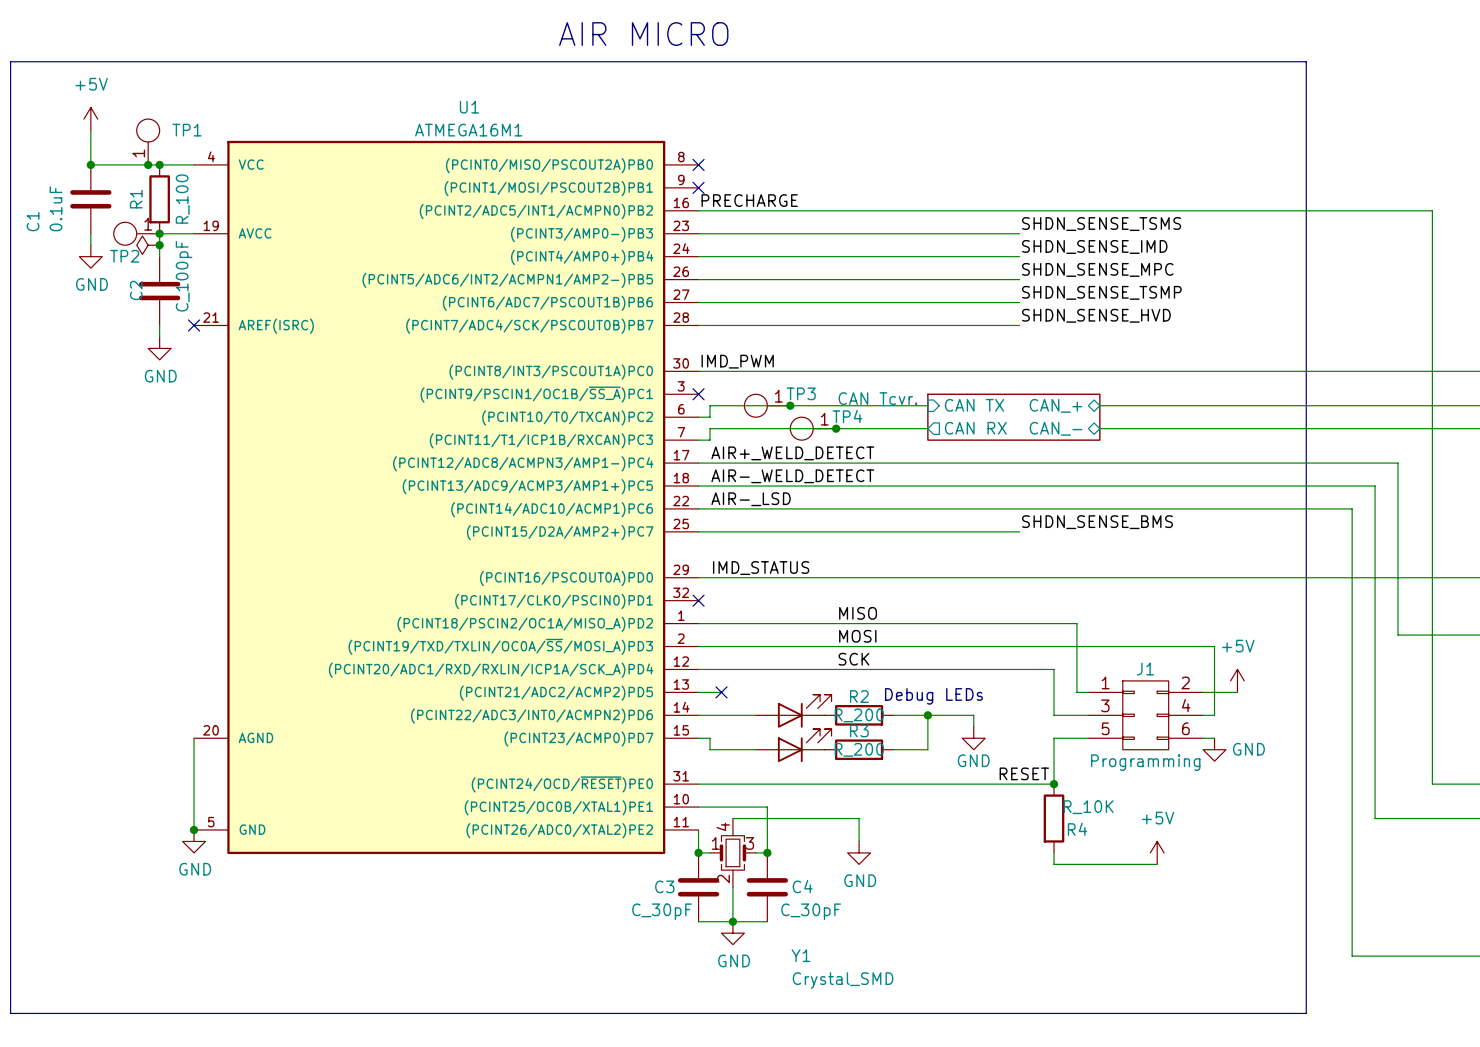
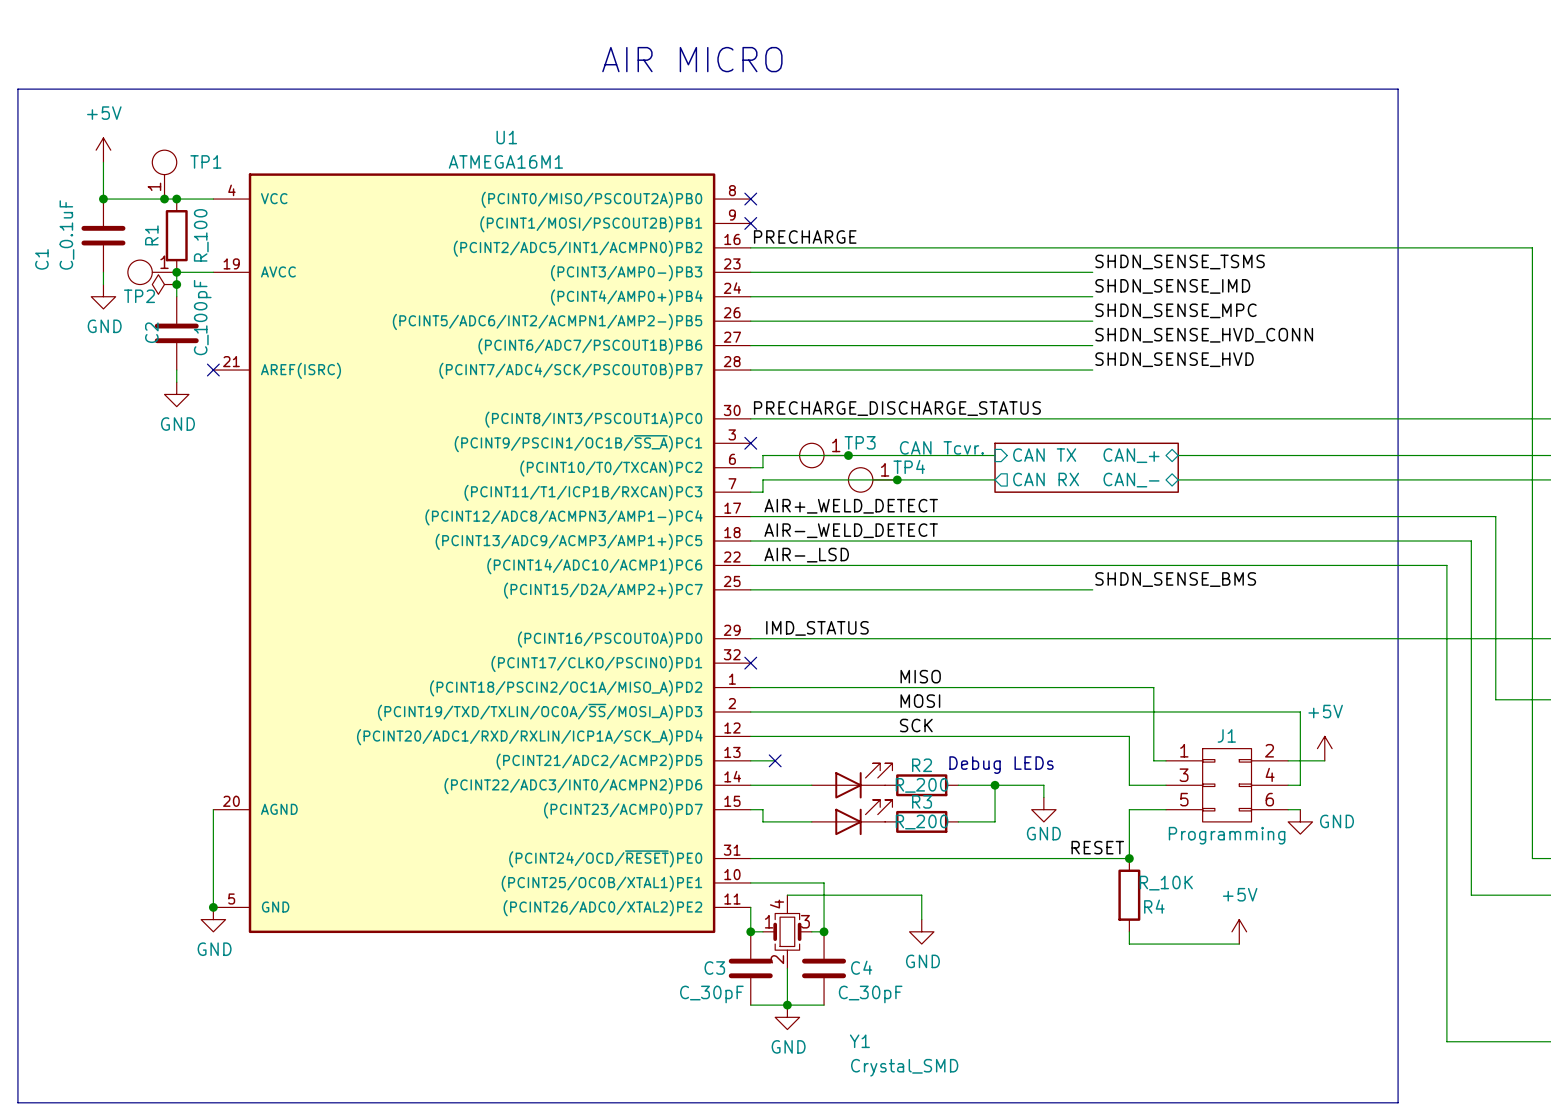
C1 value: 0.1uF (56, 208) -> C_0.1uF (66, 235)
label: SHDN_SENSE_TSMP (1101, 292) -> SHDN_SENSE_HVD_CONN (1204, 335)
label: IMD_PWM (737, 361) -> PRECHARGE_DISCHARGE_STATUS (897, 408)

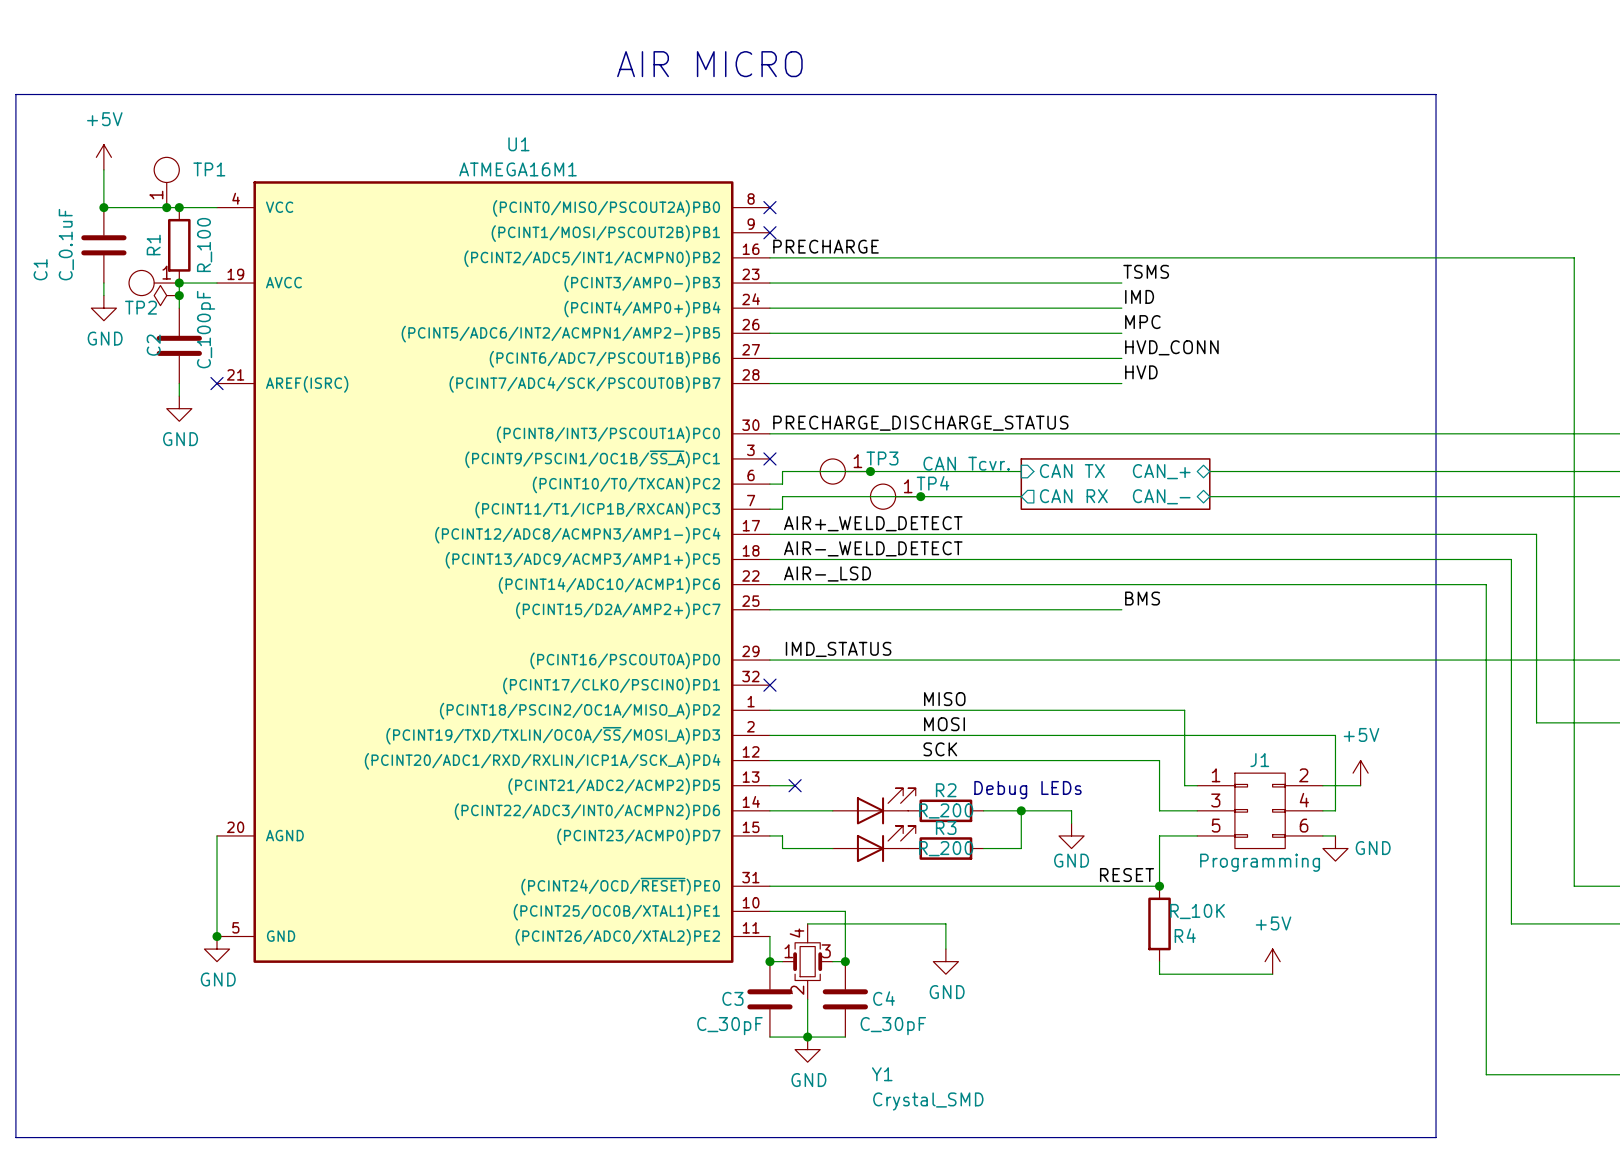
label: SHDN_SENSE_TSMS (1180, 261) -> TSMS (1146, 271)
label: SHDN_SENSE_IMD (1172, 286) -> IMD (1139, 296)
label: SHDN_SENSE_MPC (1175, 310) -> MPC (1142, 322)
label: SHDN_SENSE_HVD_CONN (1204, 335) -> HVD_CONN (1171, 347)
label: SHDN_SENSE_HVD (1174, 359) -> HVD (1141, 372)
label: SHDN_SENSE_BMS (1175, 579) -> BMS (1142, 598)

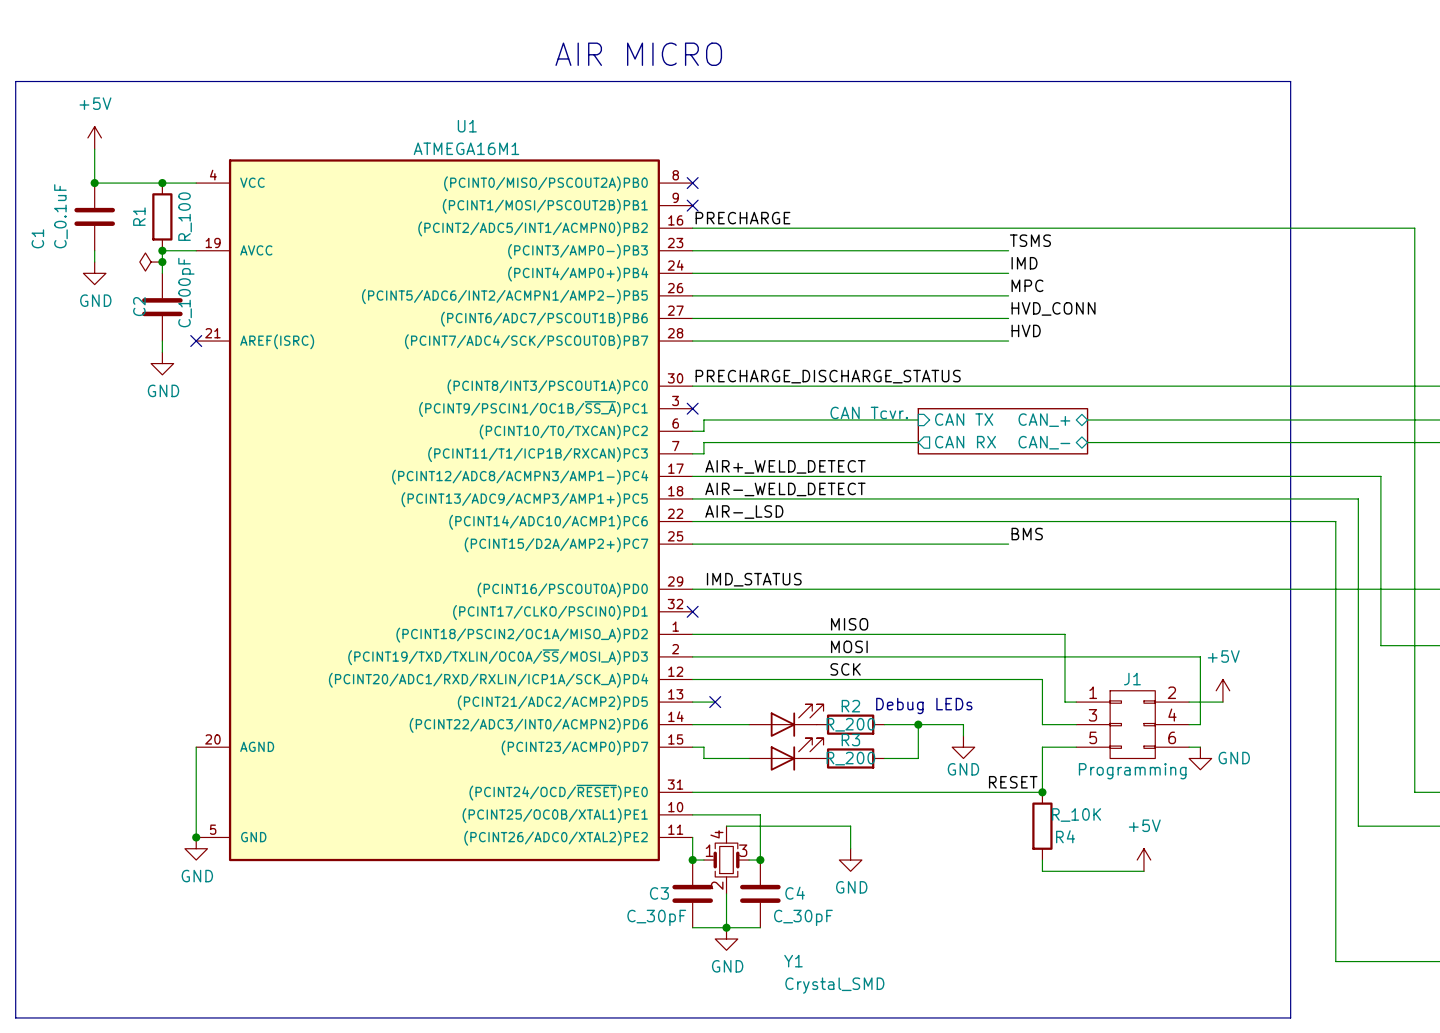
TP1: (166, 182) -> none
junction: (166, 207) -> none
TP2: (154, 283) -> none
TP3: (845, 471) -> none
junction: (870, 471) -> none
TP4: (895, 496) -> none
junction: (920, 496) -> none

